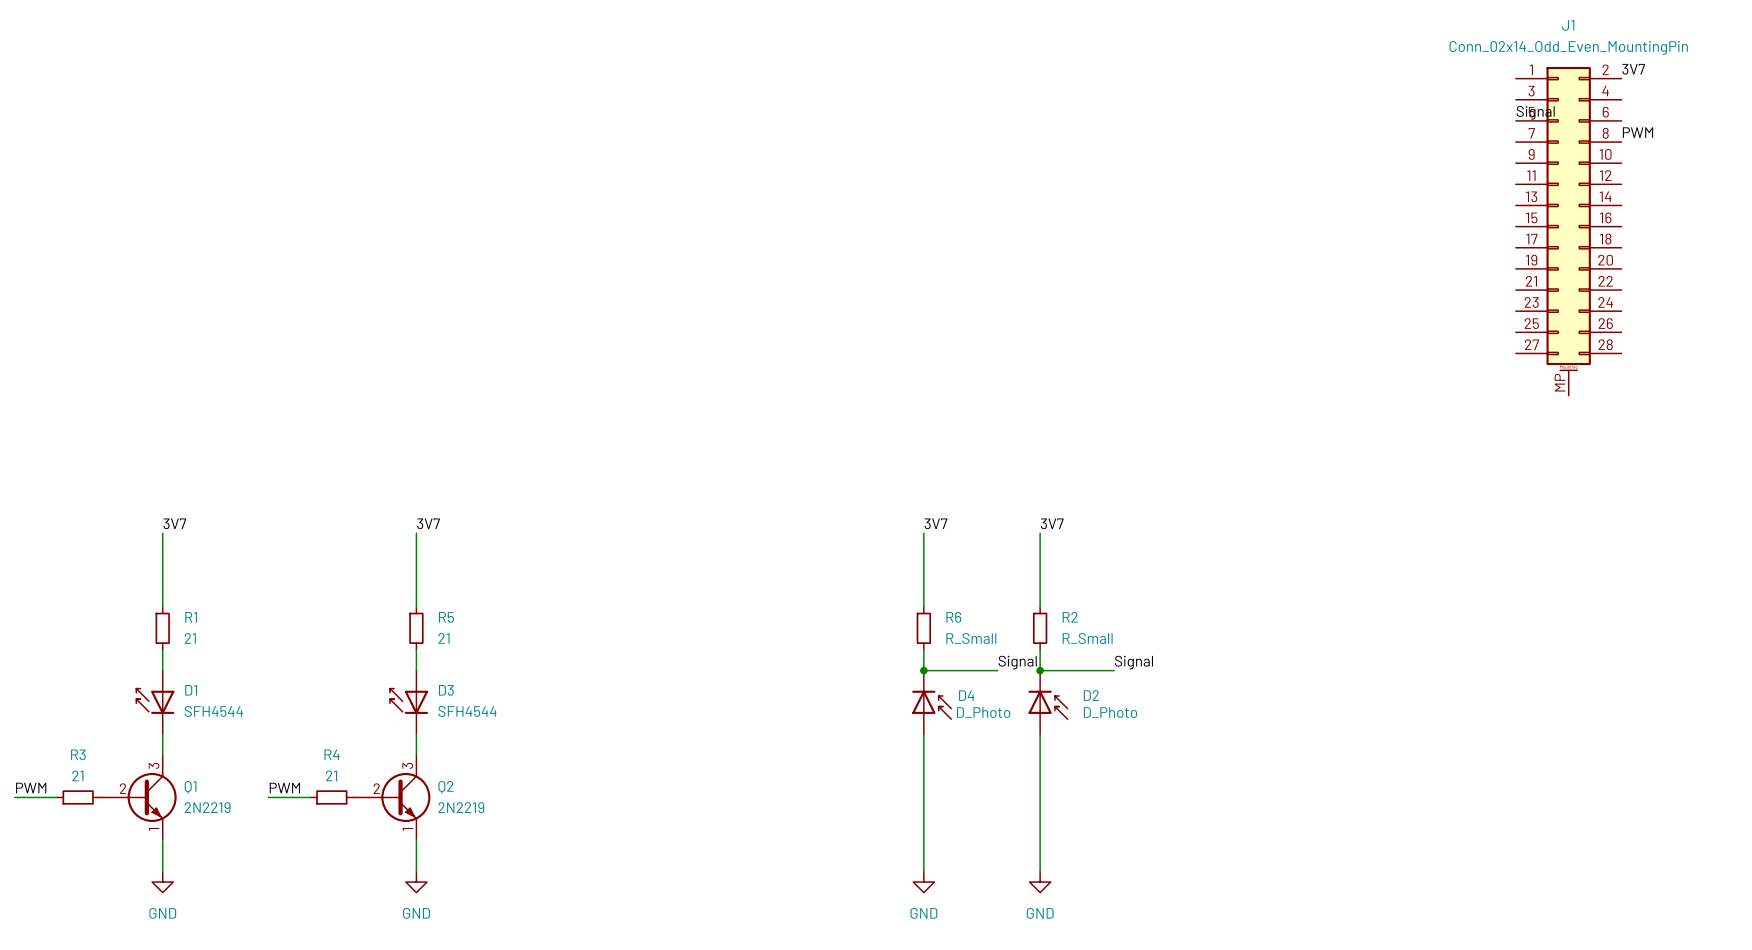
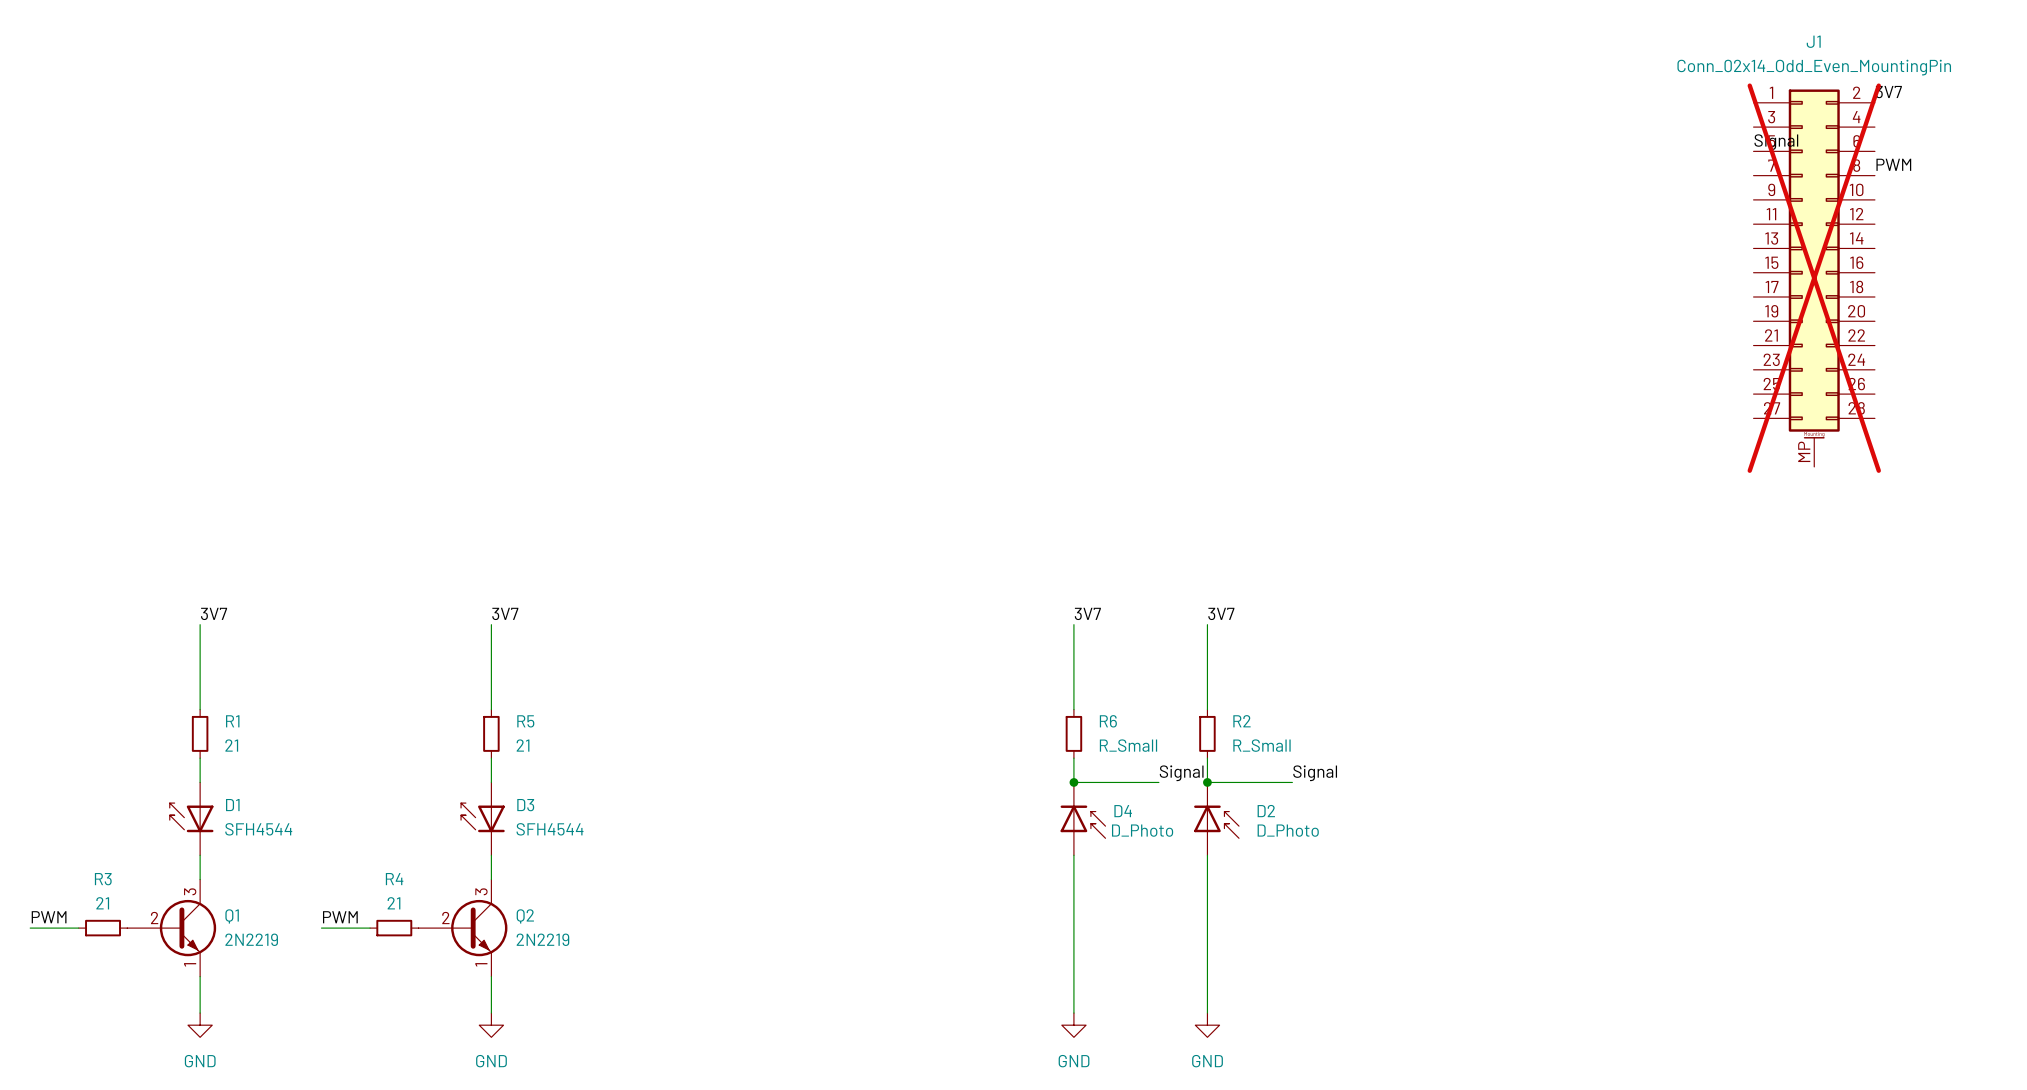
J1 do-not-place cross: none -> (1814, 278)

